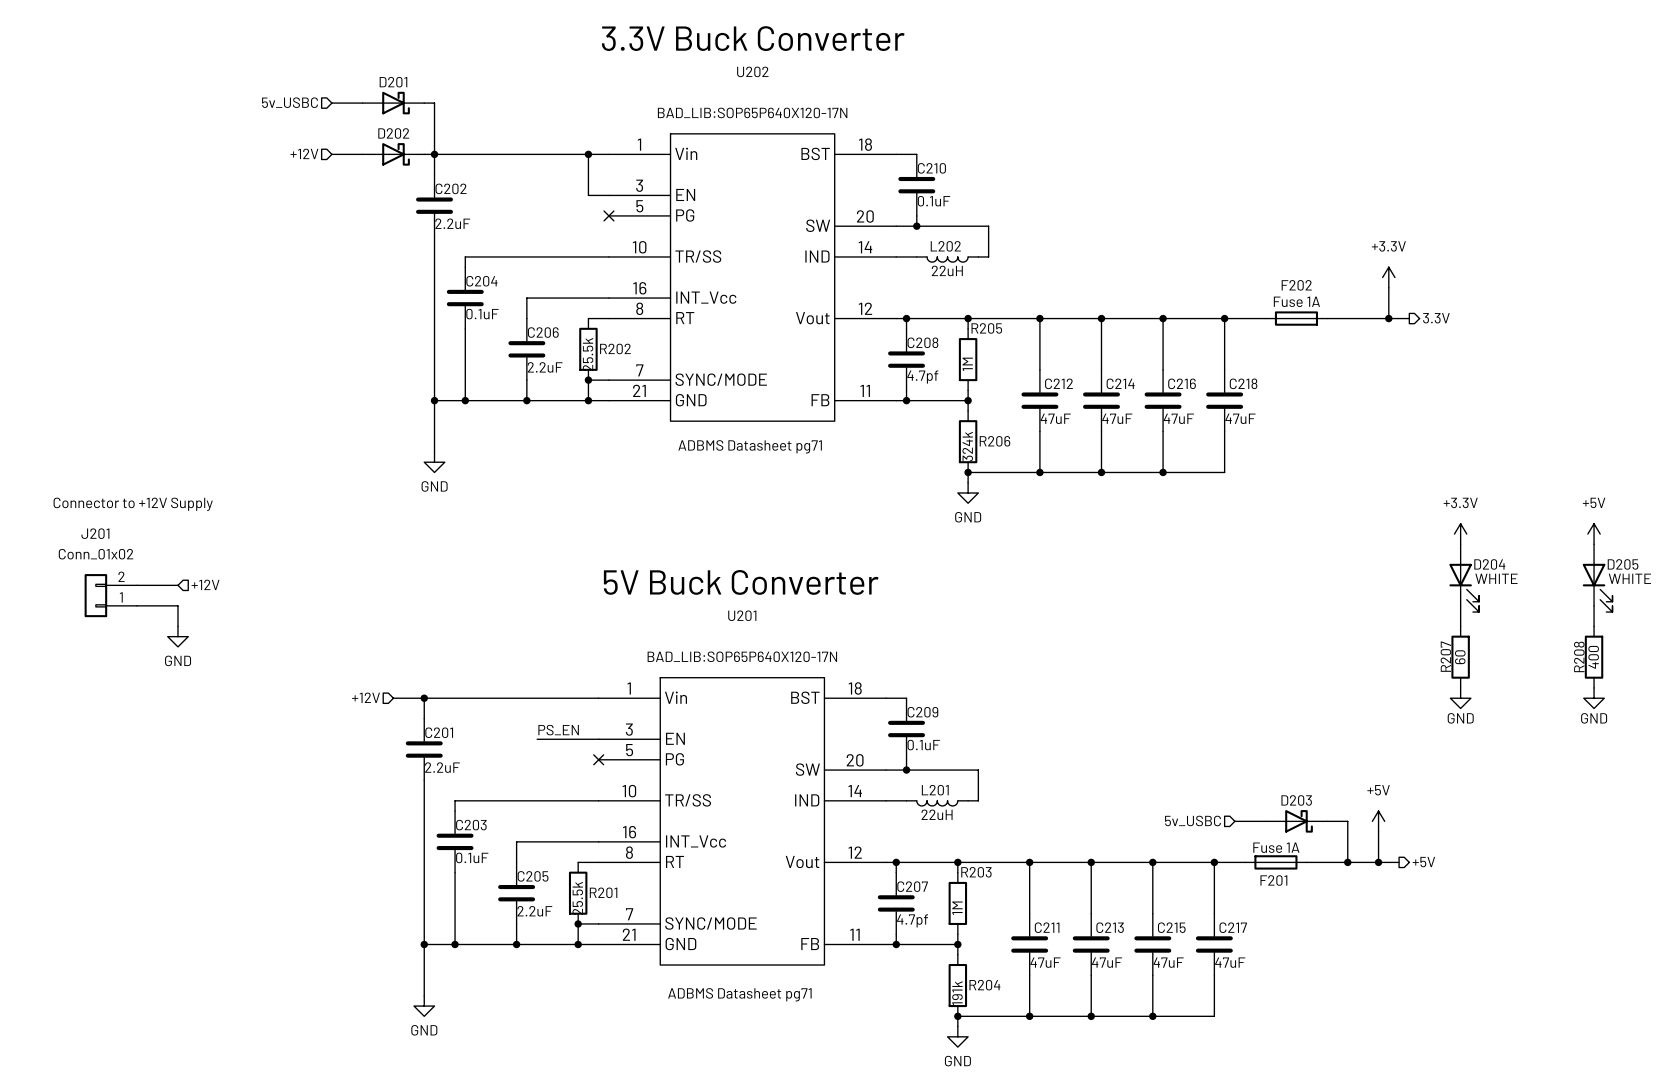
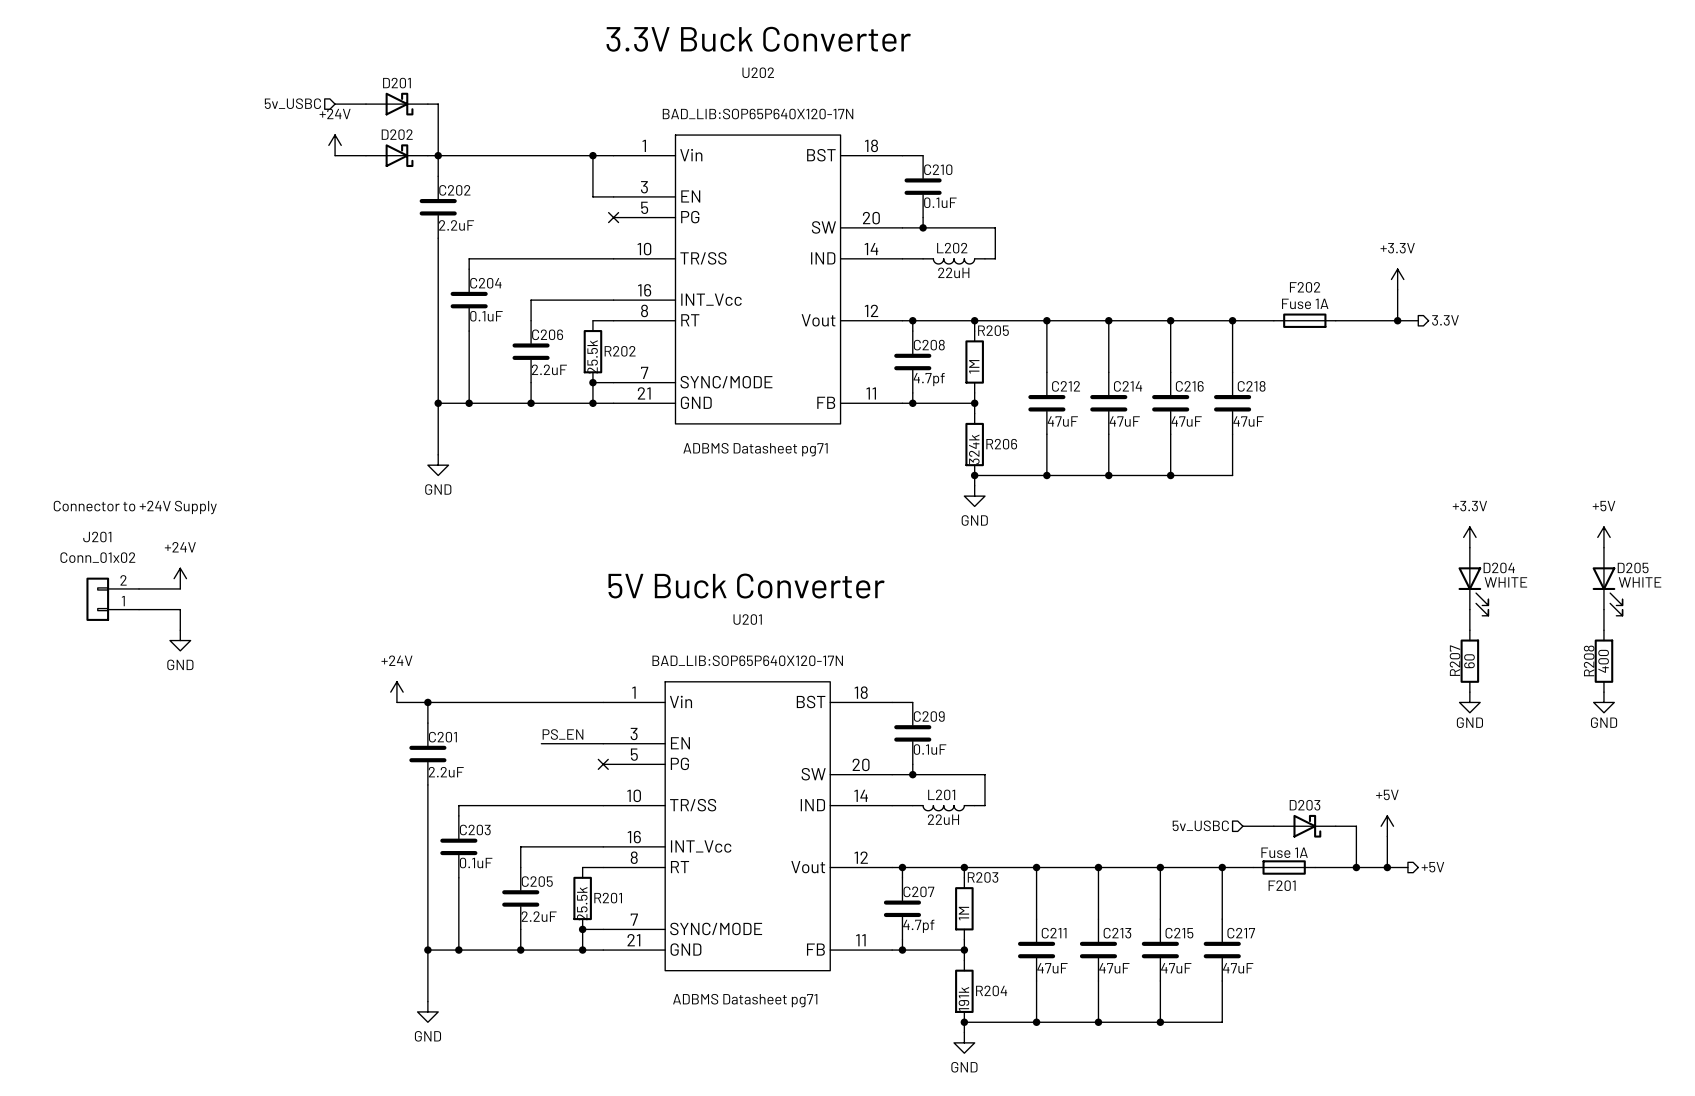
power symbol: none -> +24V (335, 145)
hierarchical label: +12V (304, 153) -> none
text: Connector to +12V Supply (133, 504) -> Connector to +24V Supply (135, 507)
power symbol: none -> +24V (180, 578)
hierarchical label: +12V (205, 584) -> none
power symbol: none -> +24V (396, 692)
hierarchical label: +12V (366, 697) -> none

